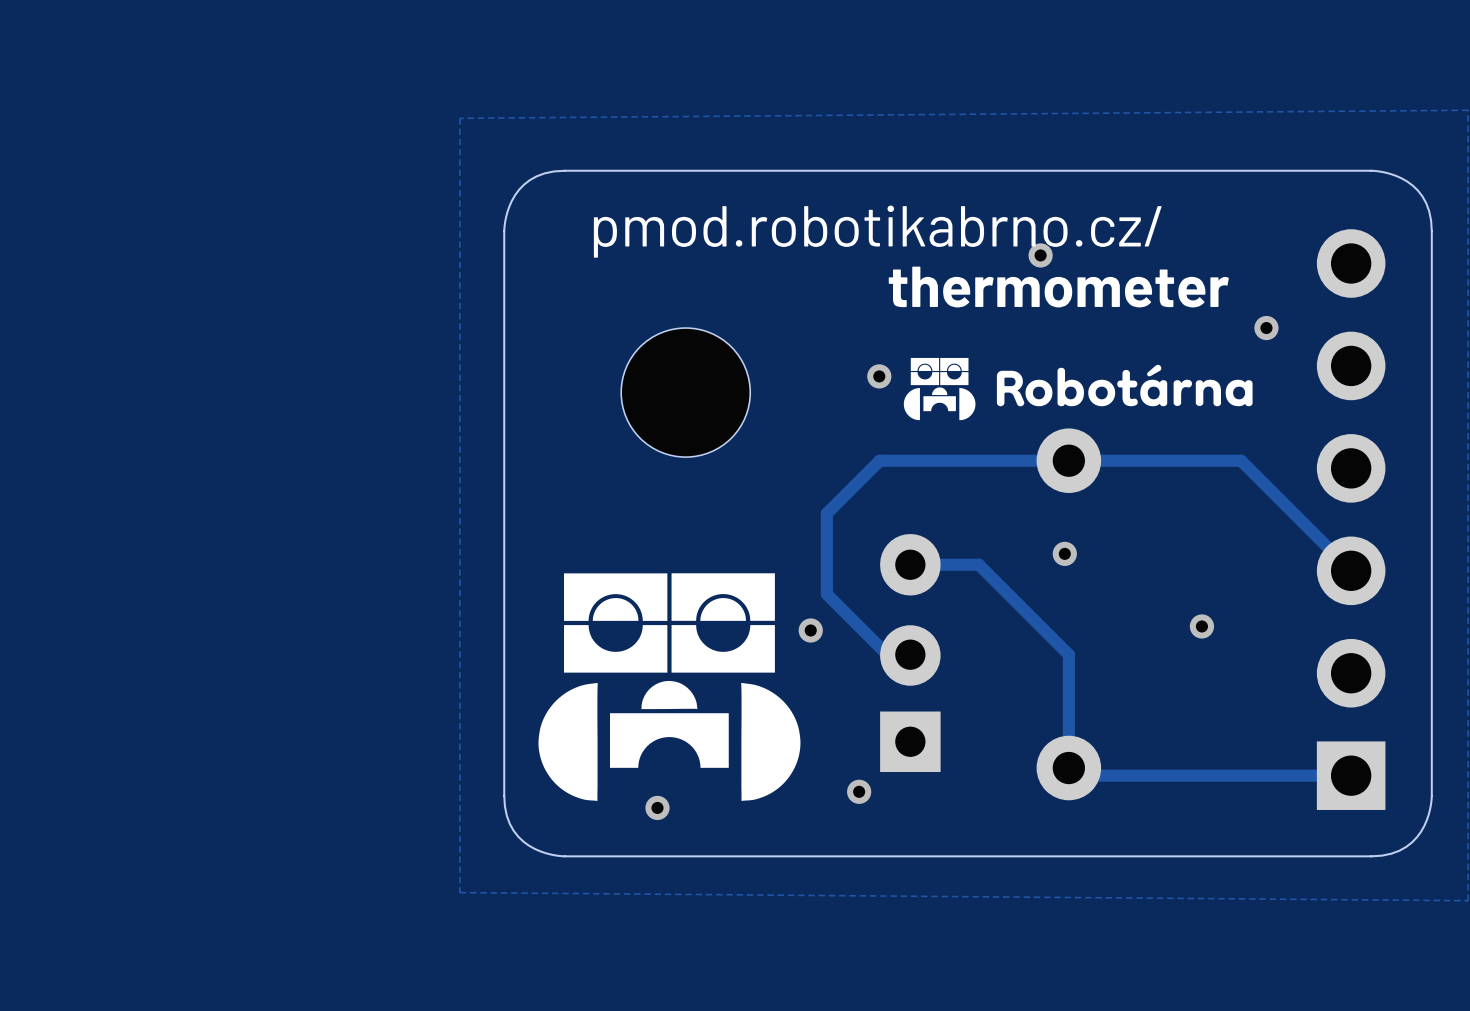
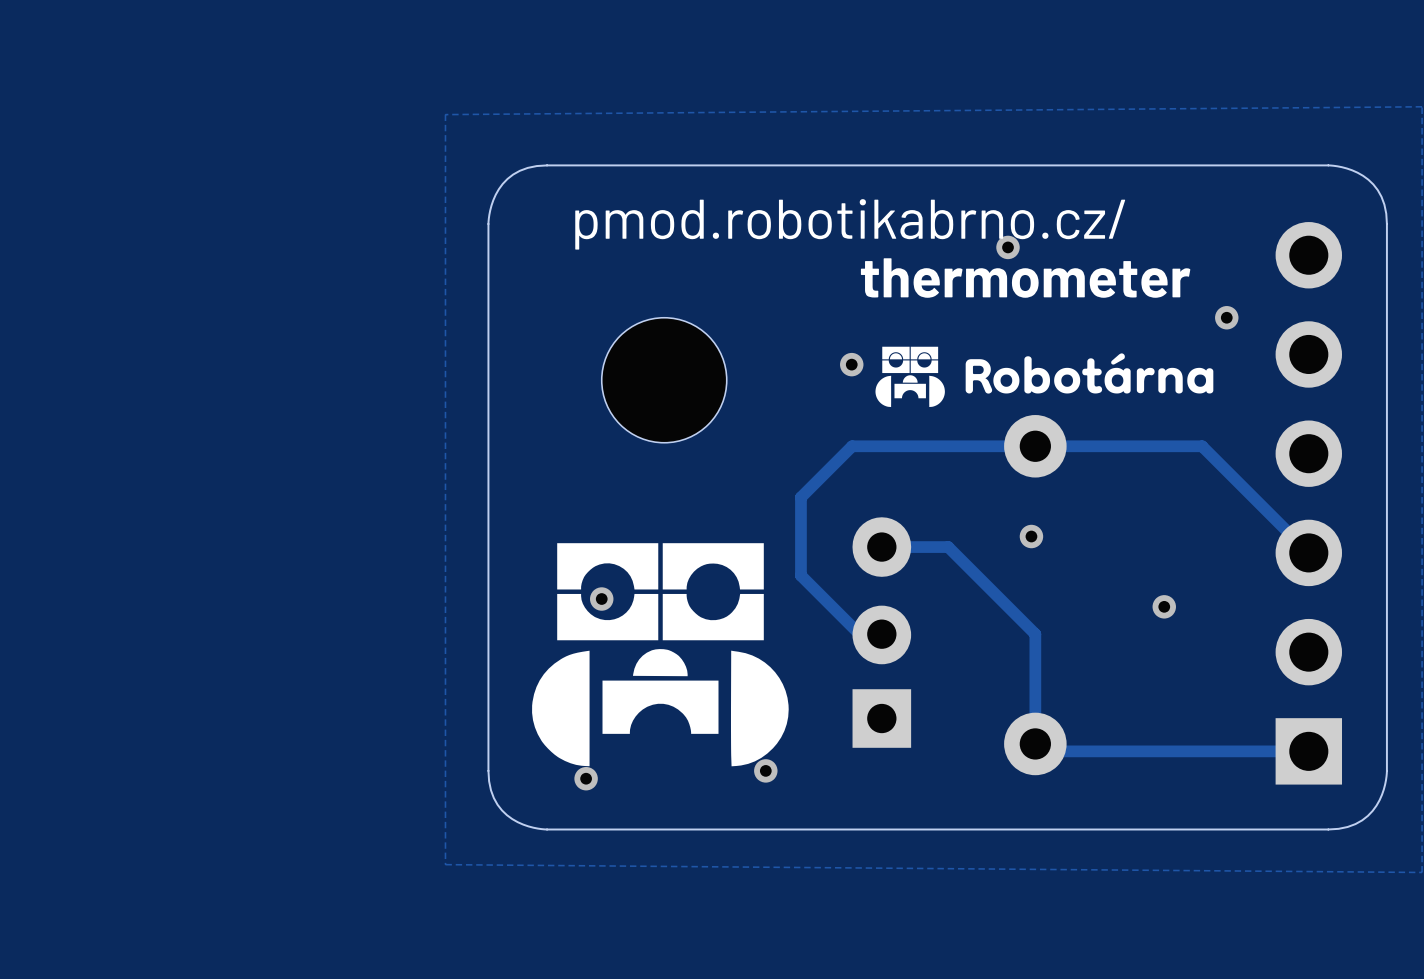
drawing: [538, 573, 801, 801] -> none
via: none -> (601, 599)
via: (810, 630) -> none
drawing shape: [641, 680, 698, 710] -> [532, 543, 789, 767]
via: (859, 791) -> none
via: none -> (765, 770)
via position: (657, 807) -> (586, 778)

